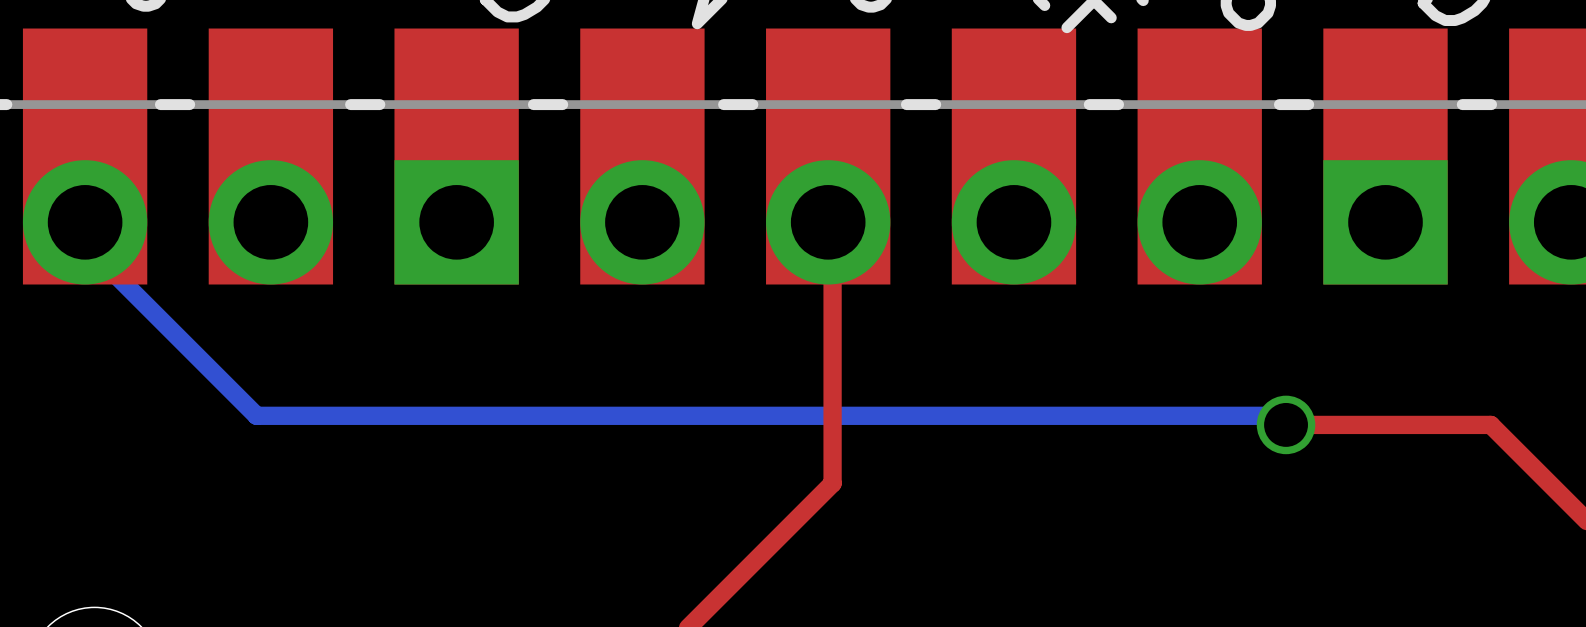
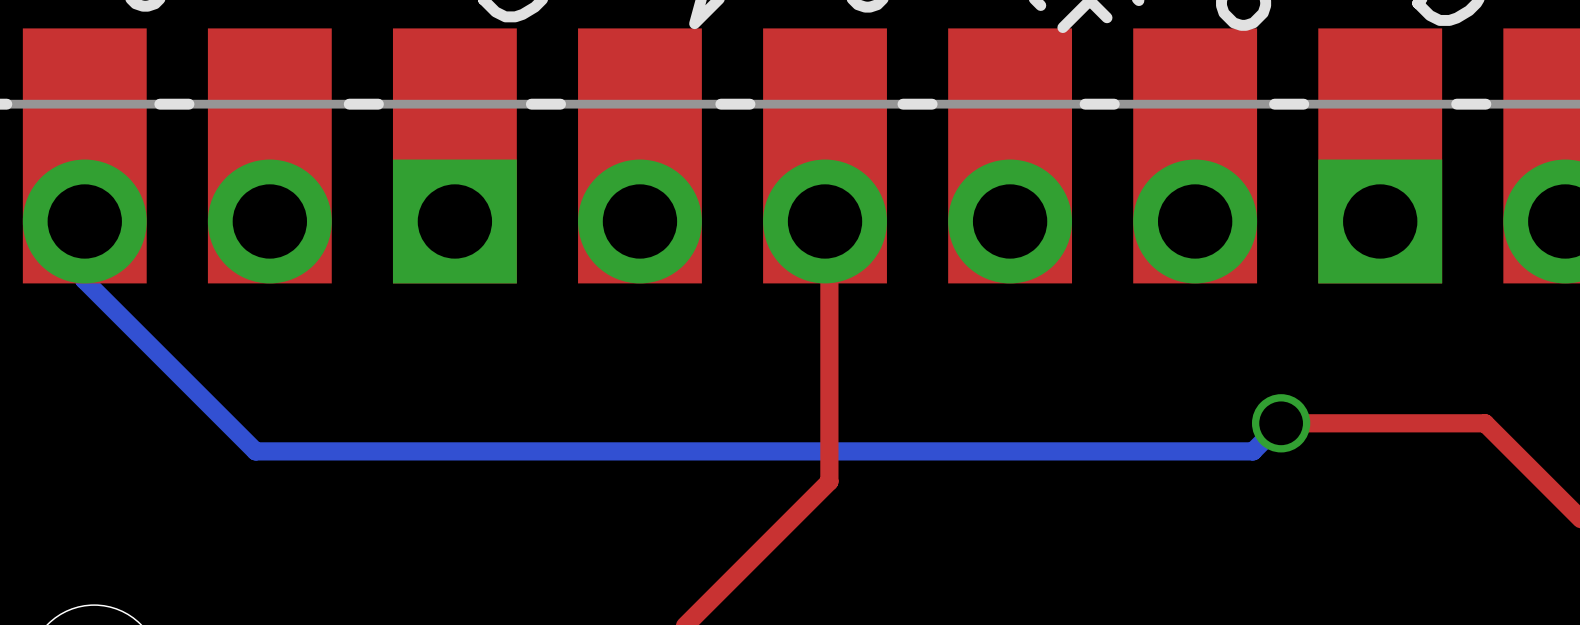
bottom track: (84, 217) (84, 243) (256, 415) (1276, 415) (1286, 424) -> (84, 253) (84, 279) (255, 451) (1253, 451) (1281, 423)

